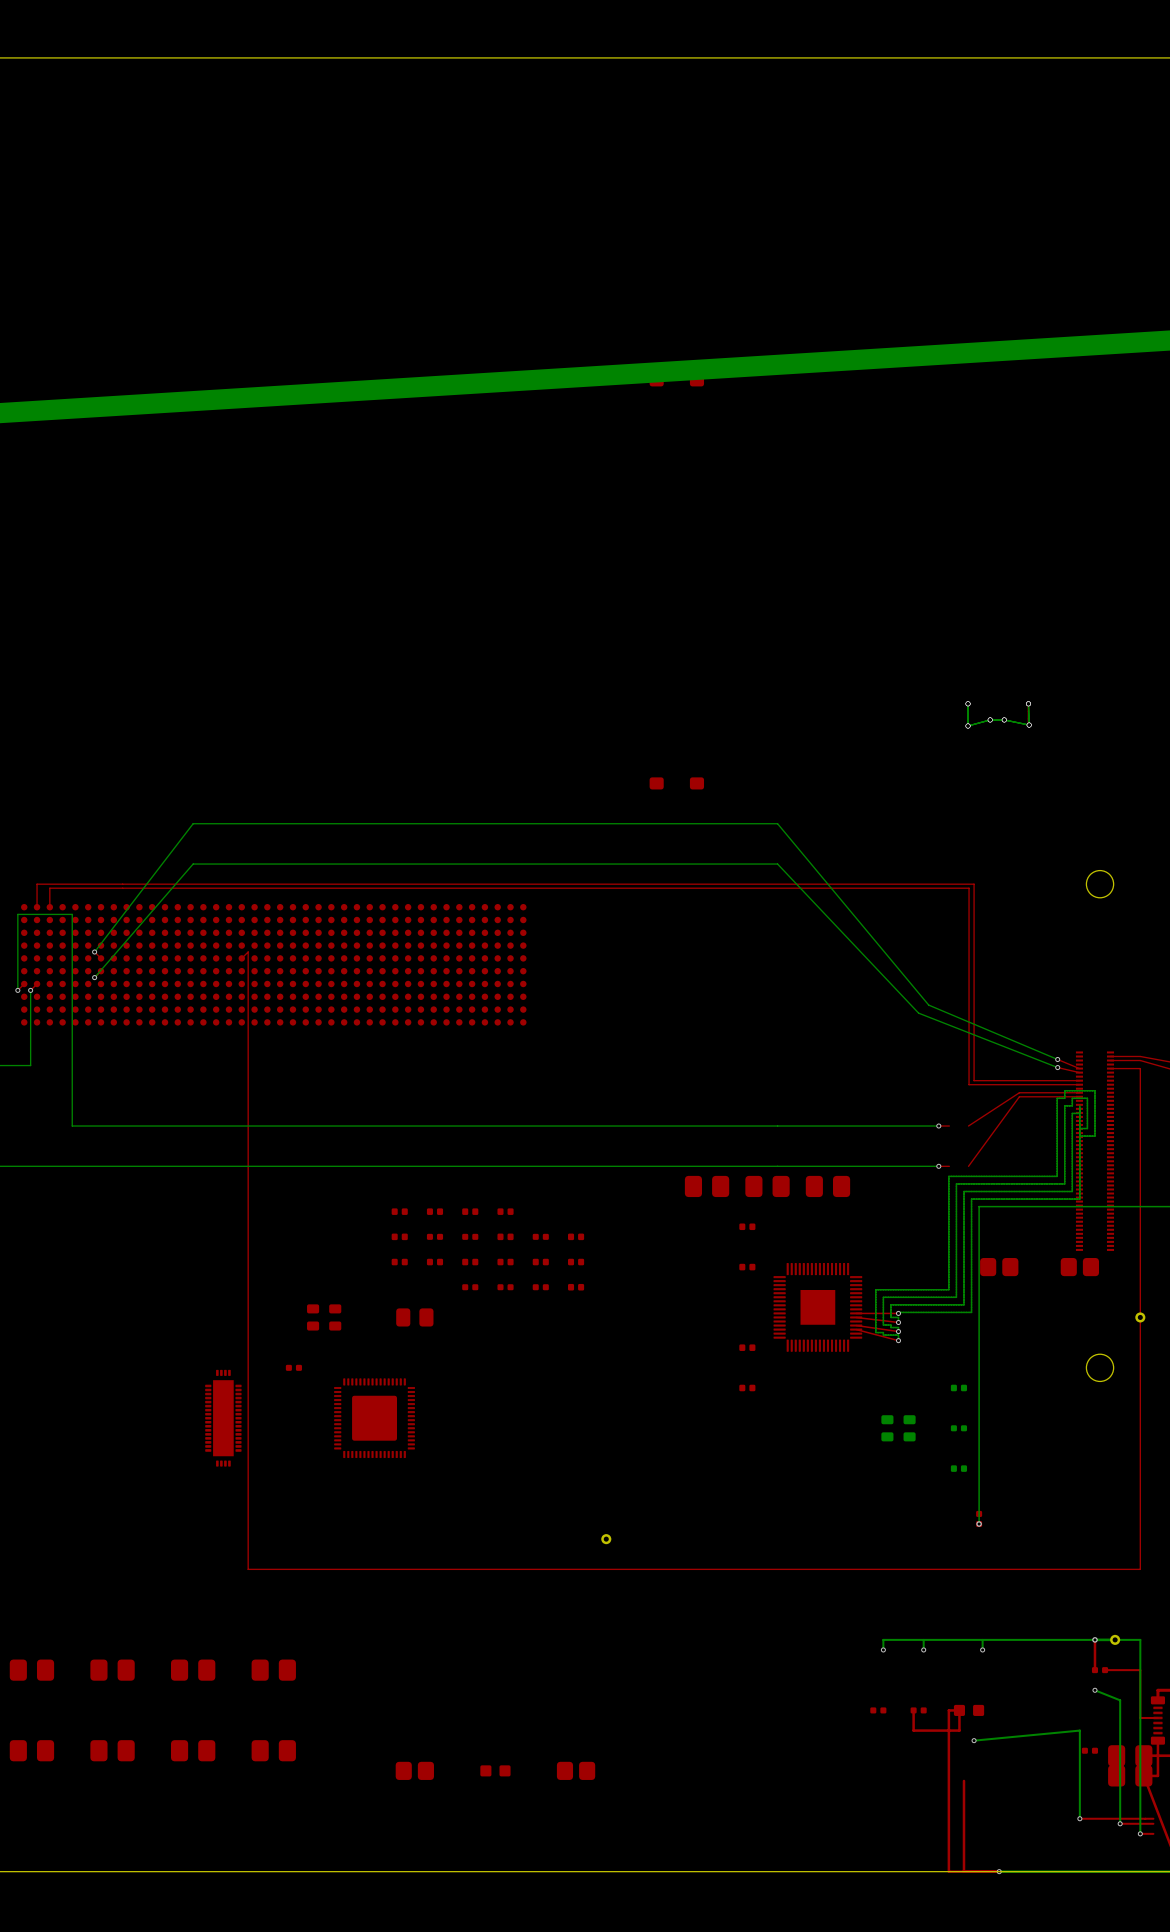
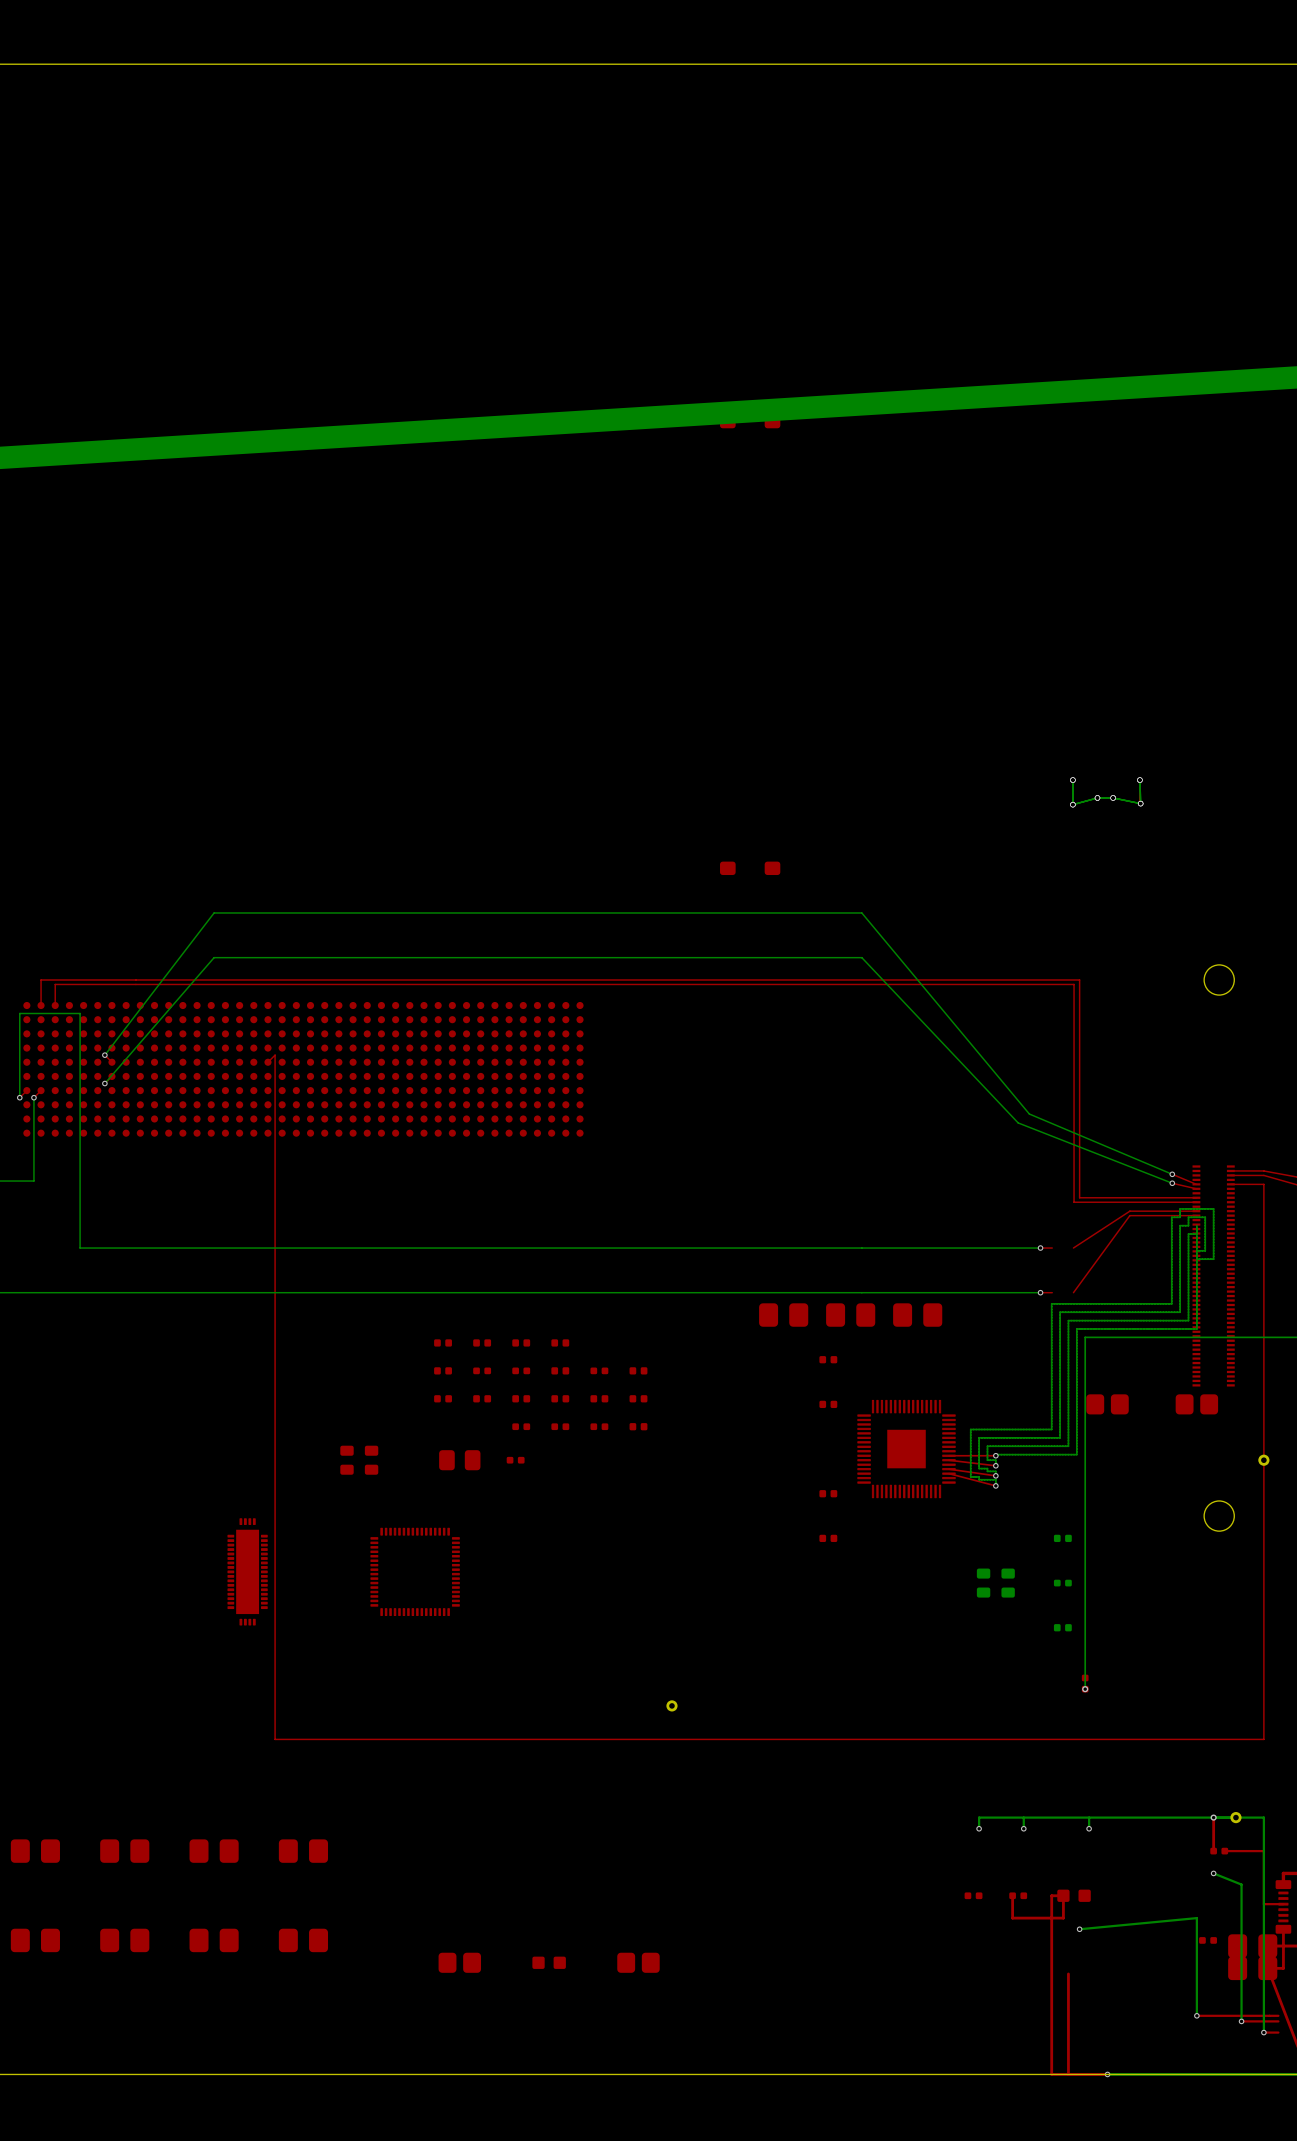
part position: (293, 1367) -> (515, 1460)
part footprint: [334, 1378, 415, 1459] -> [370, 1527, 460, 1617]

